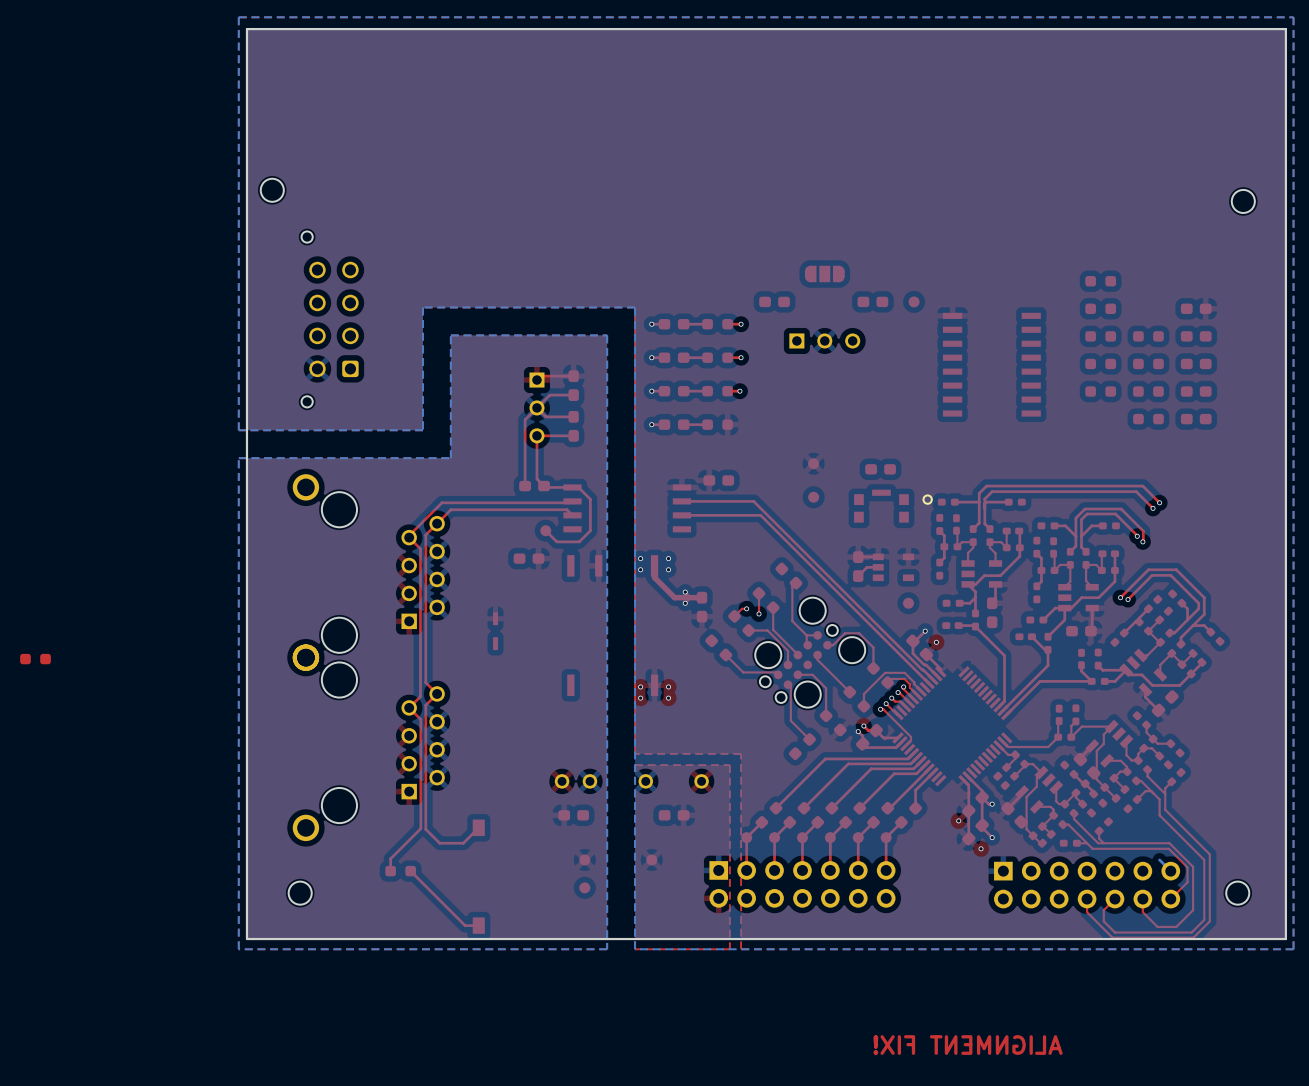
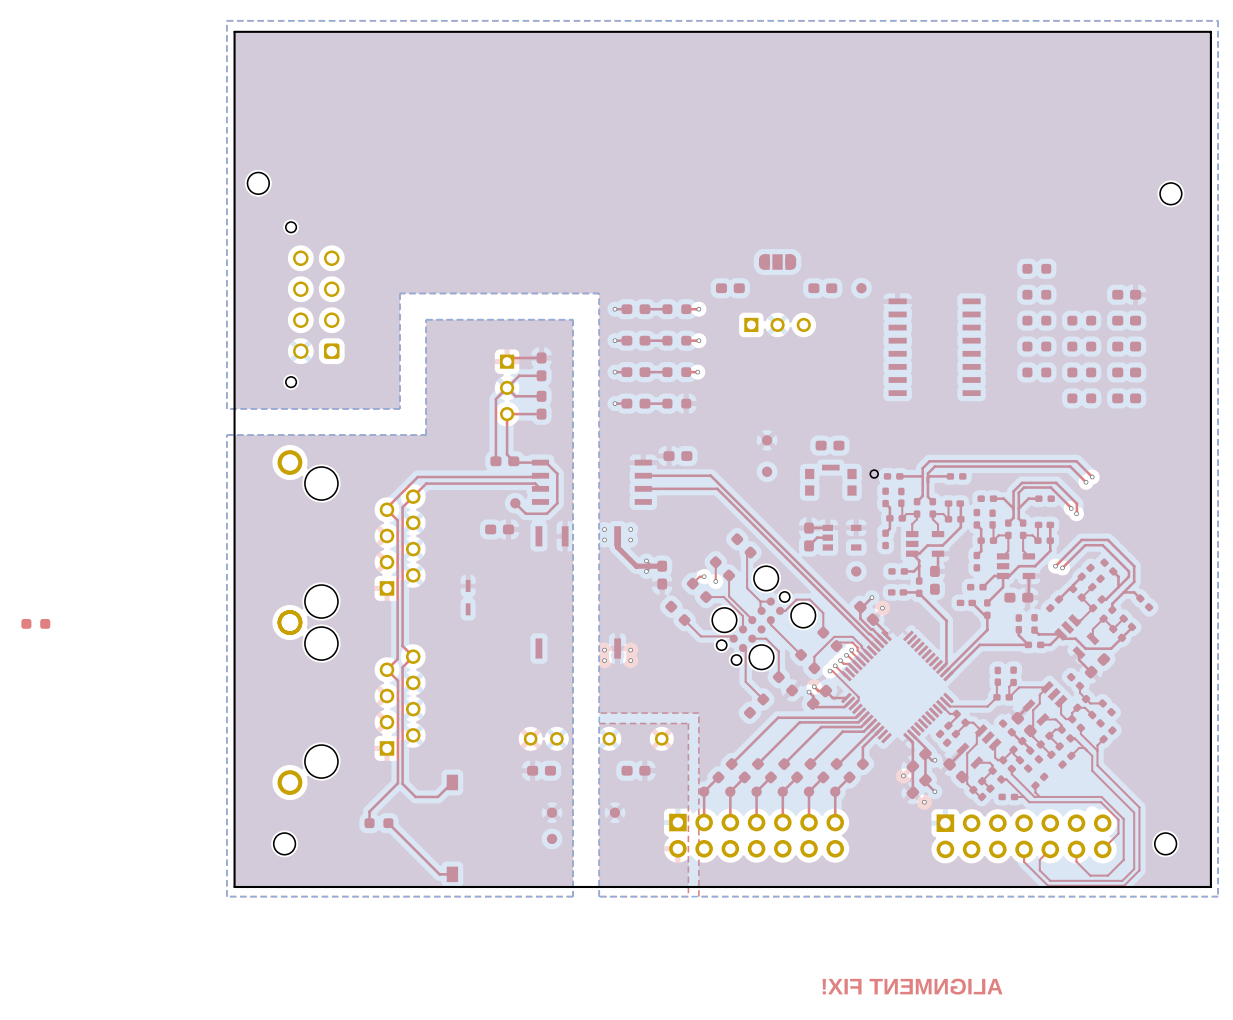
bottom track: (1159, 859) (1170, 871) -> none

